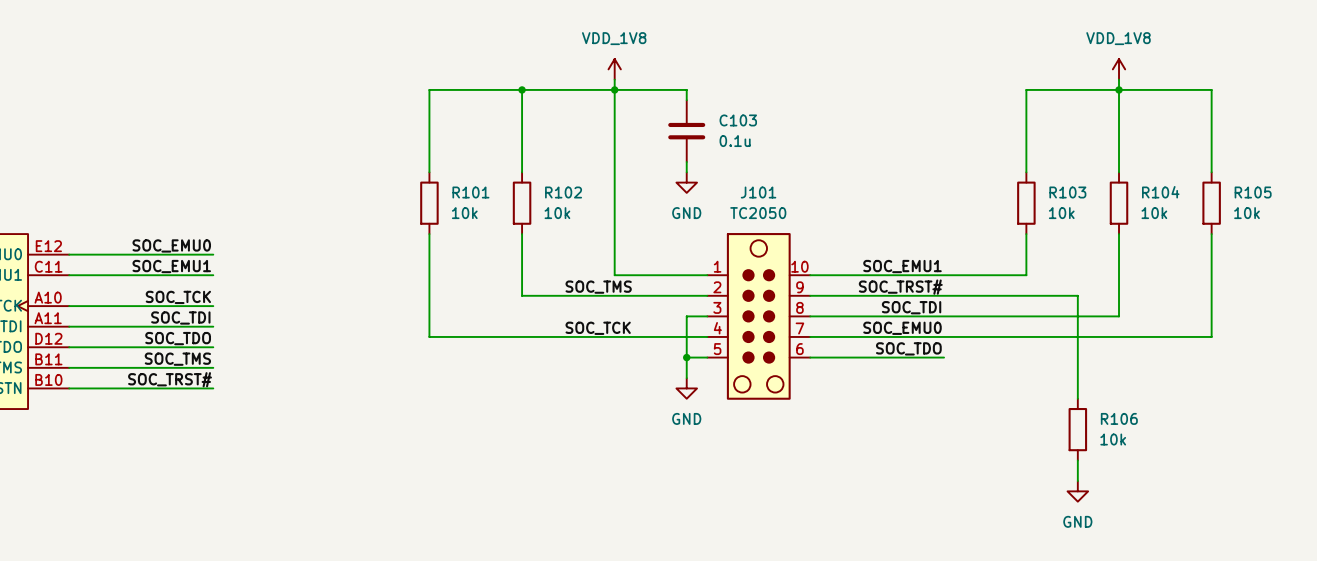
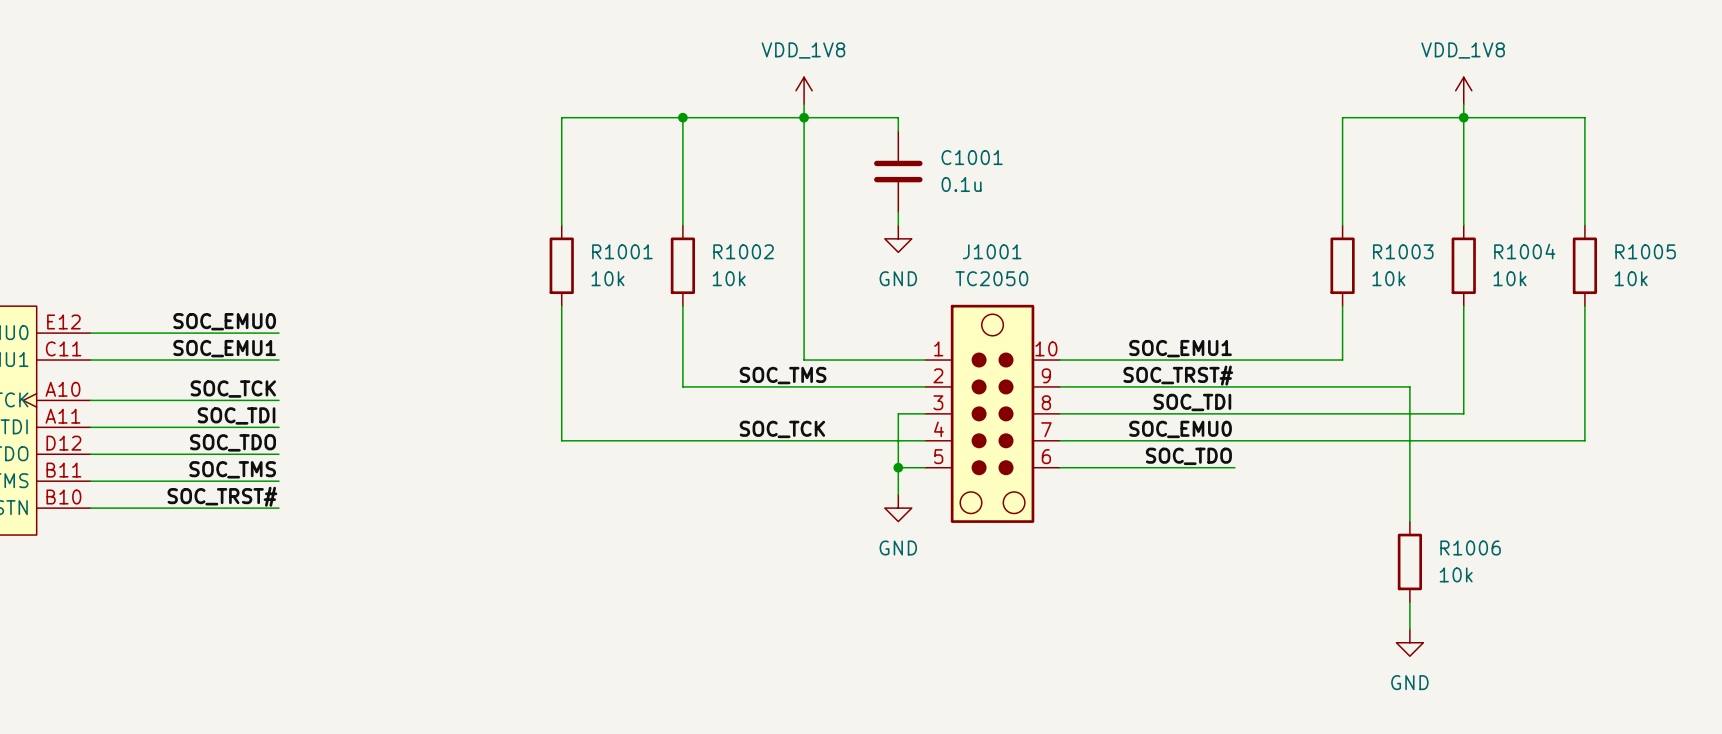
C103 name: C103 (738, 120) -> C1001 (972, 157)
R101 name: R101 (470, 192) -> R1001 (622, 251)
R102 name: R102 (563, 192) -> R1002 (743, 251)
J101 name: J101 (758, 192) -> J1001 (992, 251)
R103 name: R103 (1067, 192) -> R1003 (1403, 251)
R104 name: R104 (1160, 192) -> R1004 (1524, 251)
R105 name: R105 (1253, 192) -> R1005 (1645, 251)
R106 name: R106 (1119, 418) -> R1006 (1470, 547)

